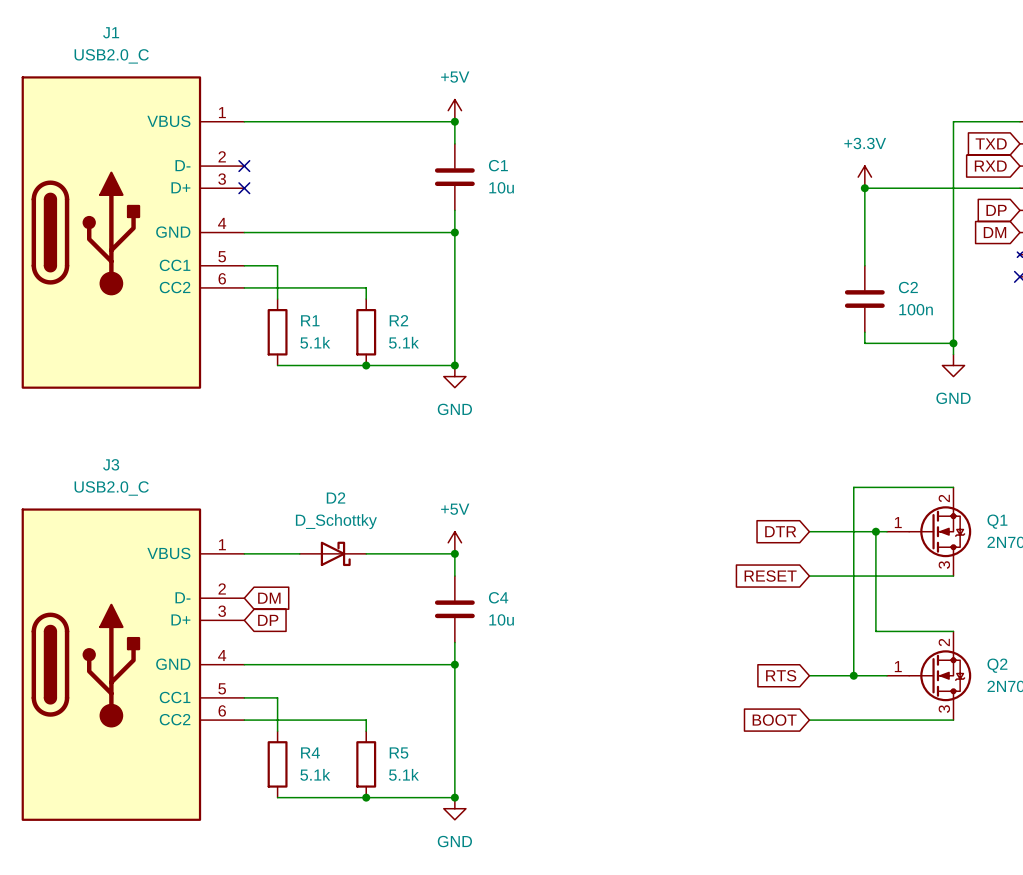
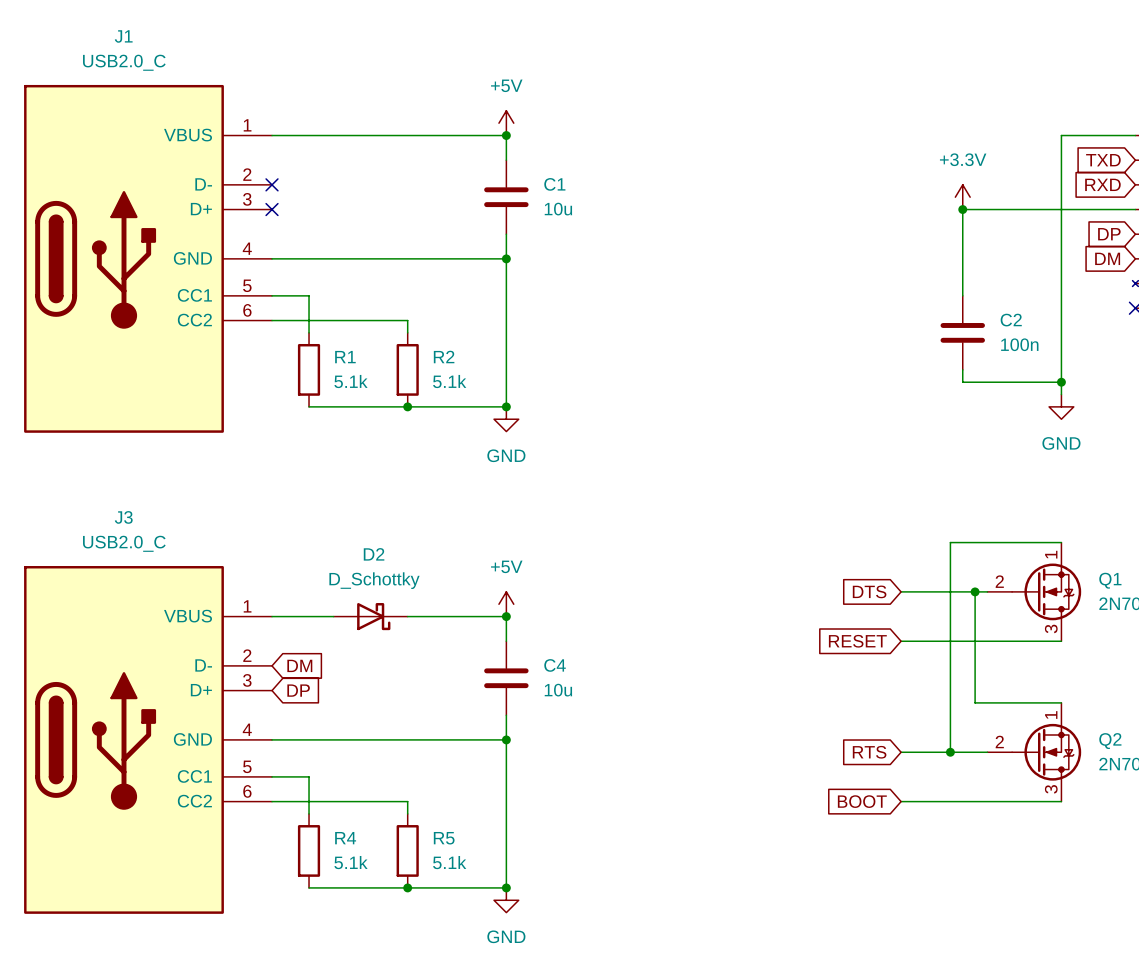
Q1 pin number: 2 (944, 498) -> 1 (1051, 554)
Q1 pin number: 1 (898, 522) -> 2 (999, 581)
global label: DTR (780, 531) -> DTS (869, 591)
Q2 pin number: 2 (944, 642) -> 1 (1051, 715)
Q2 pin number: 1 (898, 666) -> 2 (999, 741)

